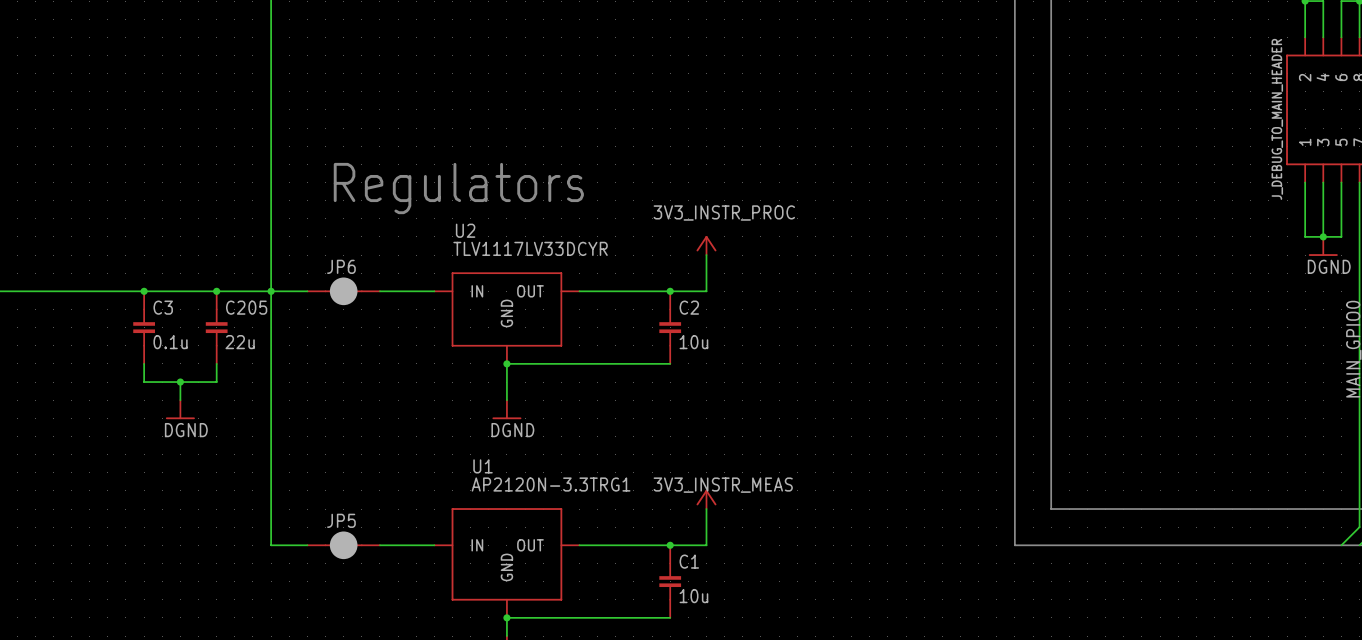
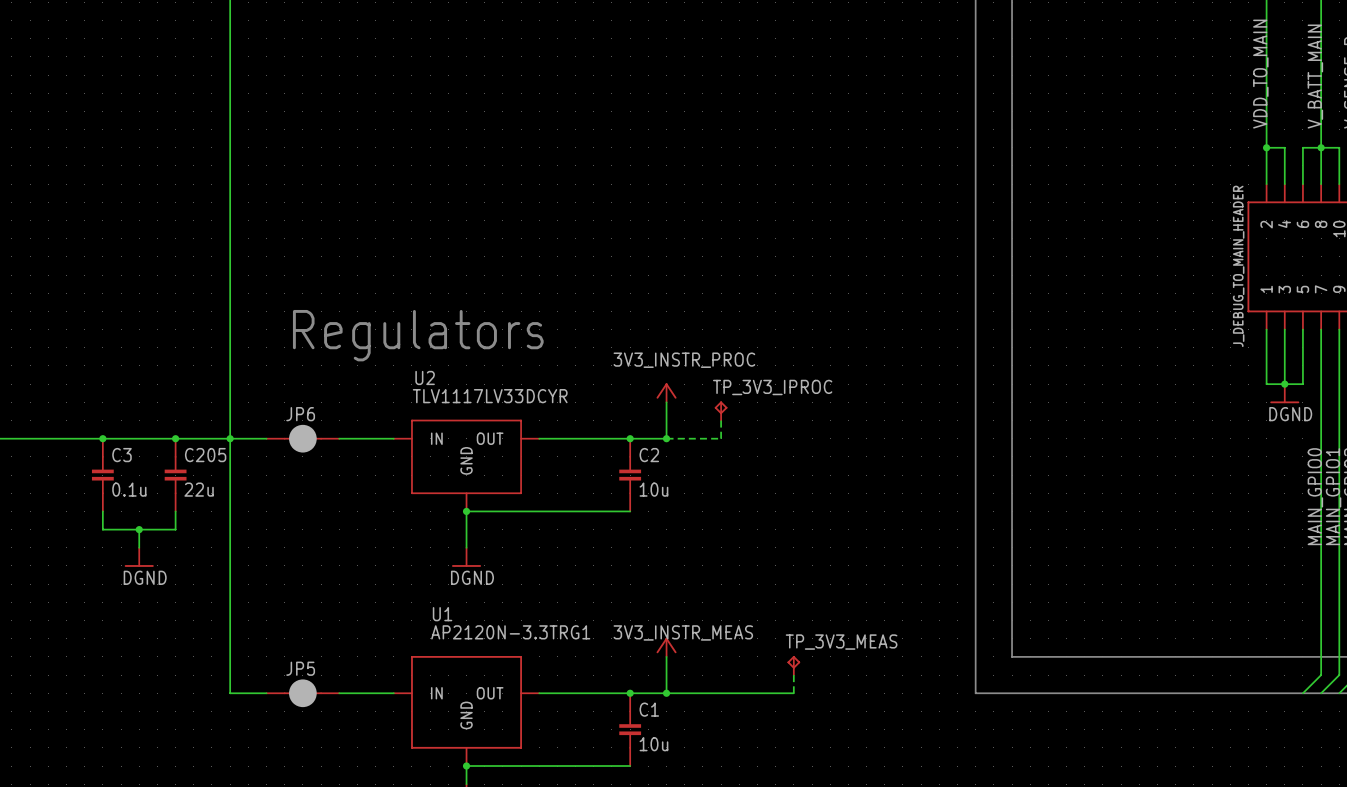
TP_3V3_IPROC: none -> (721, 410)
wire: none -> (721, 420) (721, 438) (666, 438)
junction: none -> (666, 438)
TP_3V3_MEAS: none -> (793, 665)
wire: none -> (793, 675) (793, 693) (666, 693)
junction: none -> (666, 693)

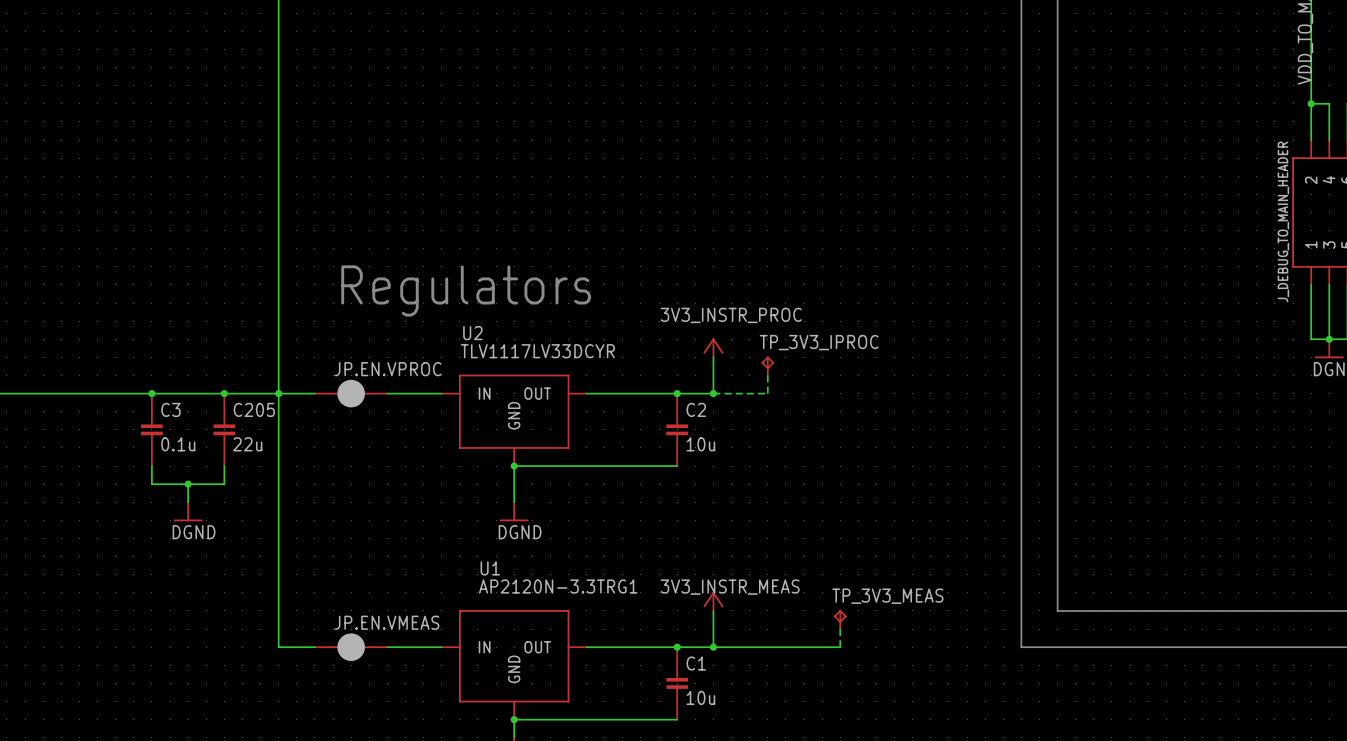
JP6 name: JP6 (300, 414) -> JP.EN.VPROC (388, 369)
JP5 name: JP5 (300, 668) -> JP.EN.VMEAS (386, 622)

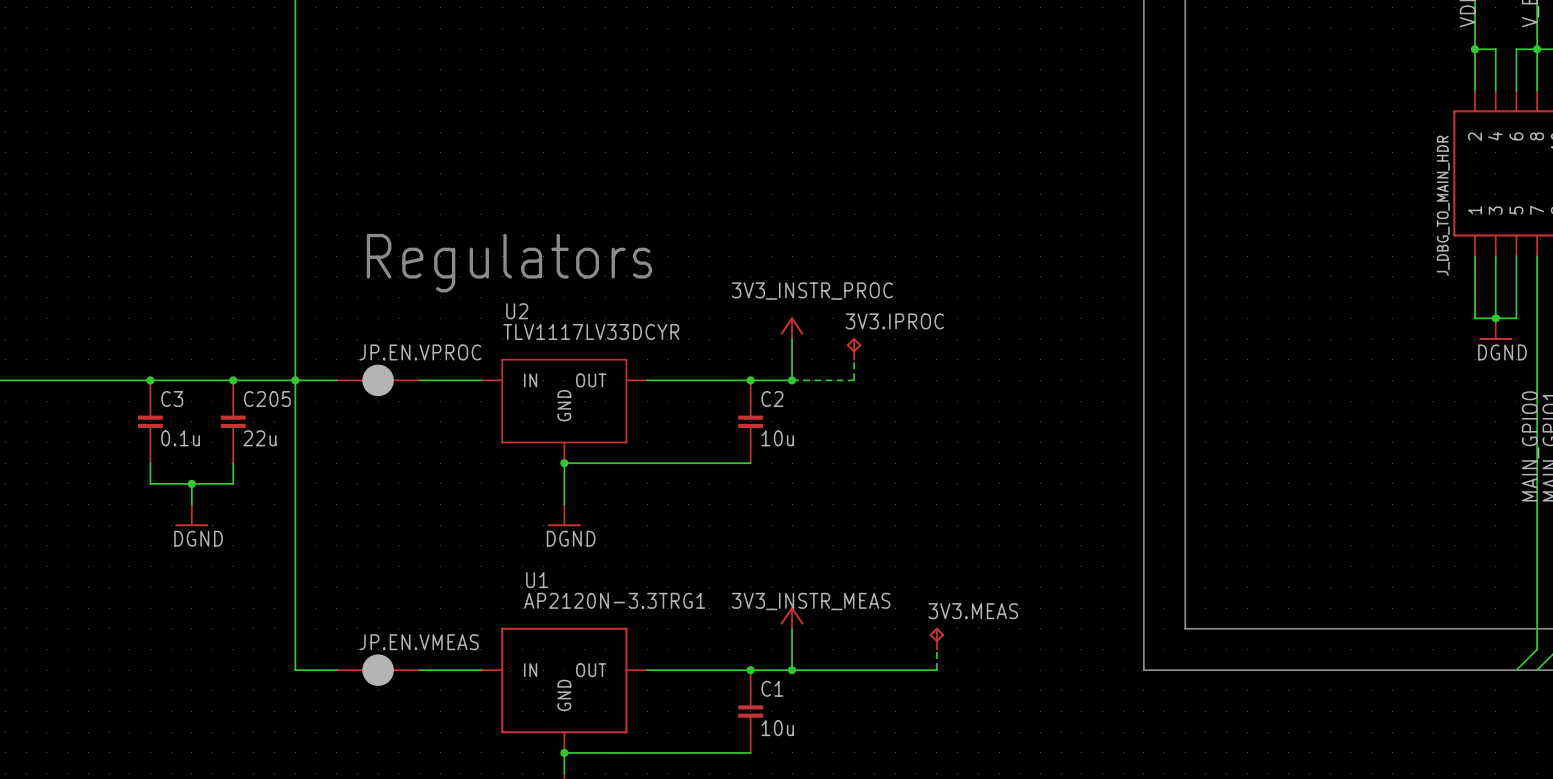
J_DEBUG_TO_MAIN_HEADER name: J_DEBUG_TO_MAIN_HEADER (1283, 221) -> J_DBG_TO_MAIN_HDR (1443, 205)
TP_3V3_IPROC name: TP_3V3_IPROC (819, 342) -> 3V3.IPROC (894, 321)
TP_3V3_MEAS name: TP_3V3_MEAS (887, 596) -> 3V3.MEAS (973, 611)

